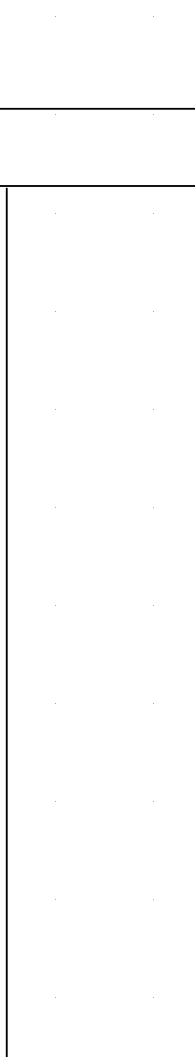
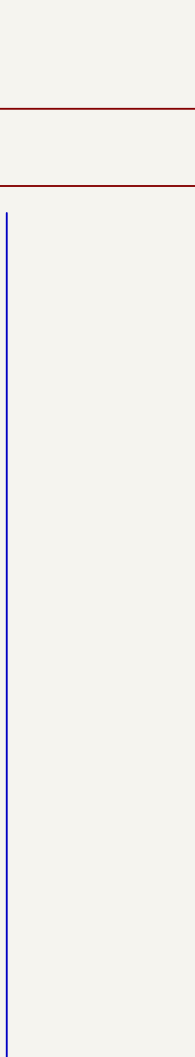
line: (6, 188) (6, 213) -> none

